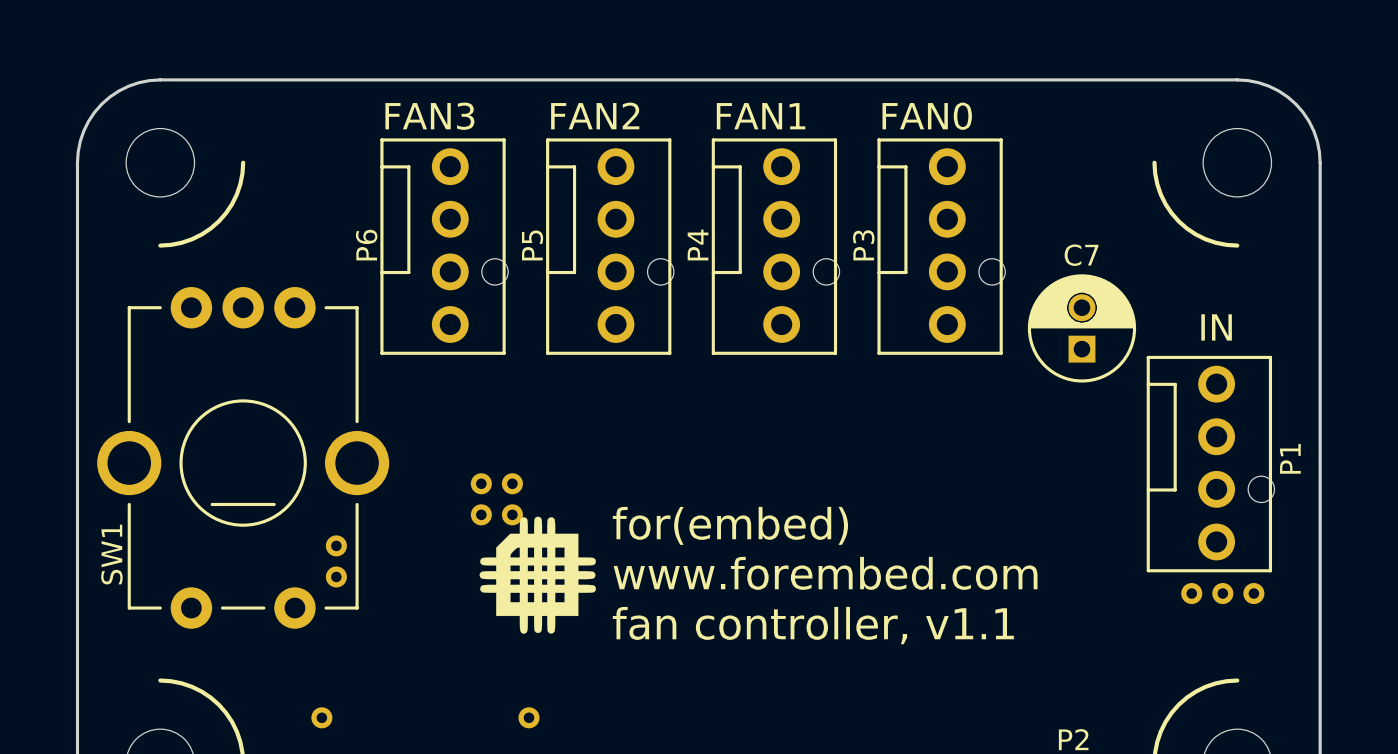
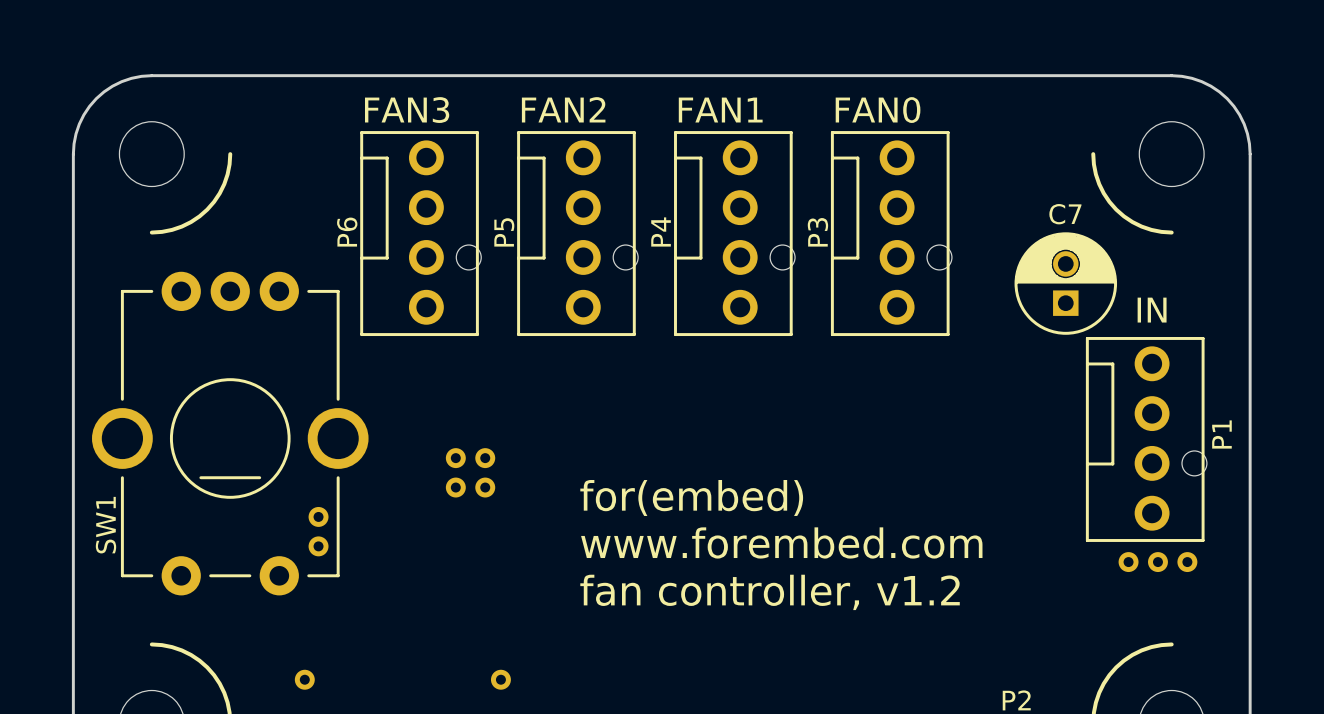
C7 position: (1081, 328) -> (1065, 283)
drawing: [479, 516, 596, 634] -> none
text: fan controller, v1.1 (813, 625) -> fan controller, v1.2 (770, 592)

